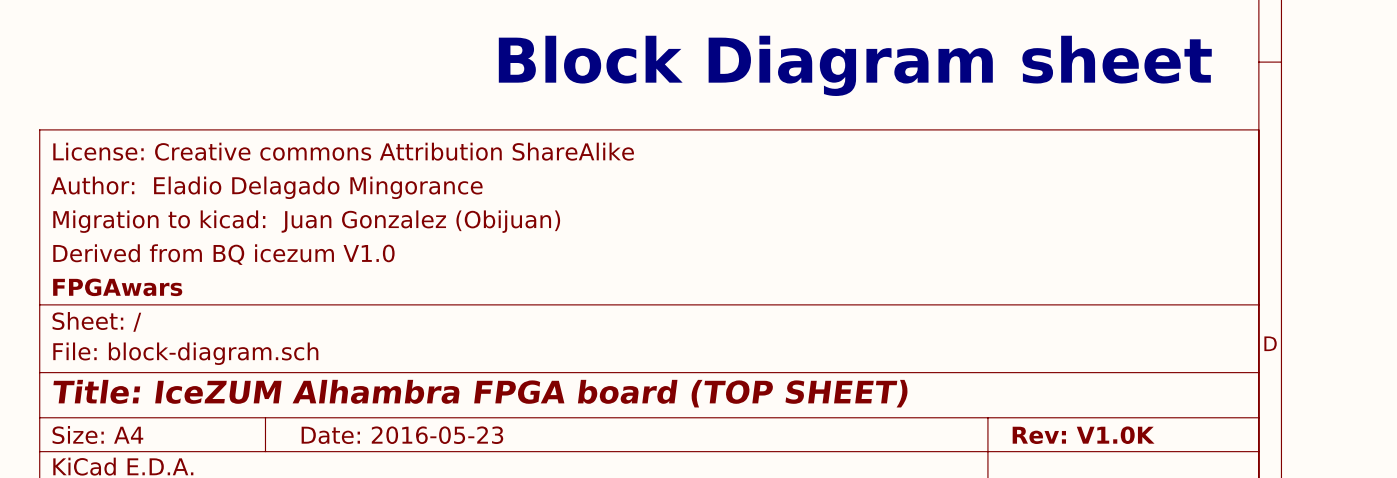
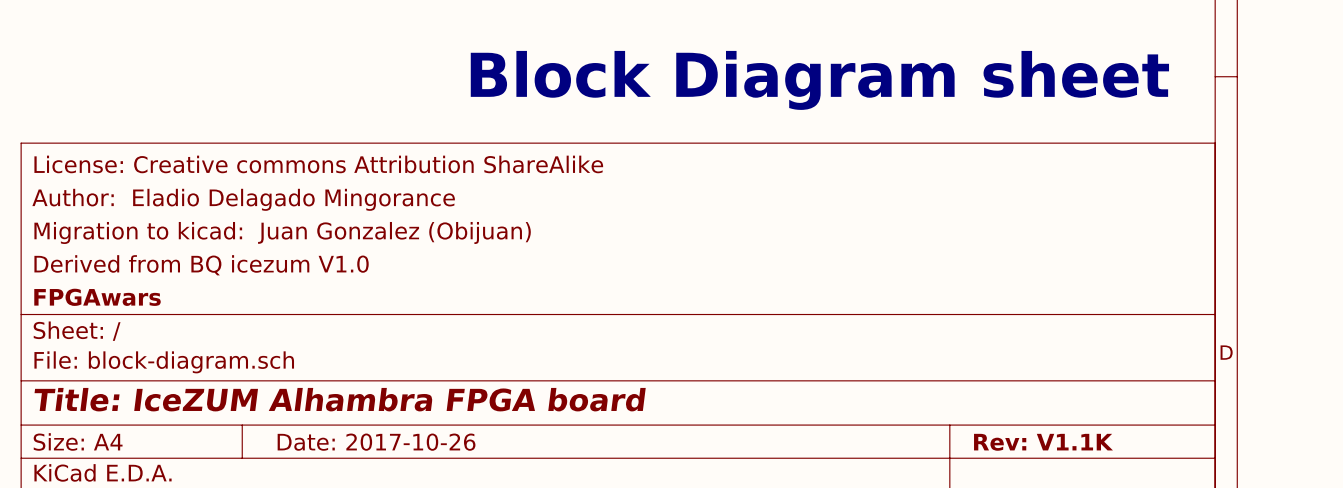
title block: Title: IceZUM Alhambra FPGA board (TOP SHEET) (480, 393) -> Title: IceZUM Alhambra FPGA board (340, 399)
title block: Date: 2016-05-23 (402, 435) -> Date: 2017-10-26 (376, 442)
title block: Rev: V1.0K (1083, 435) -> Rev: V1.1K (1043, 442)

